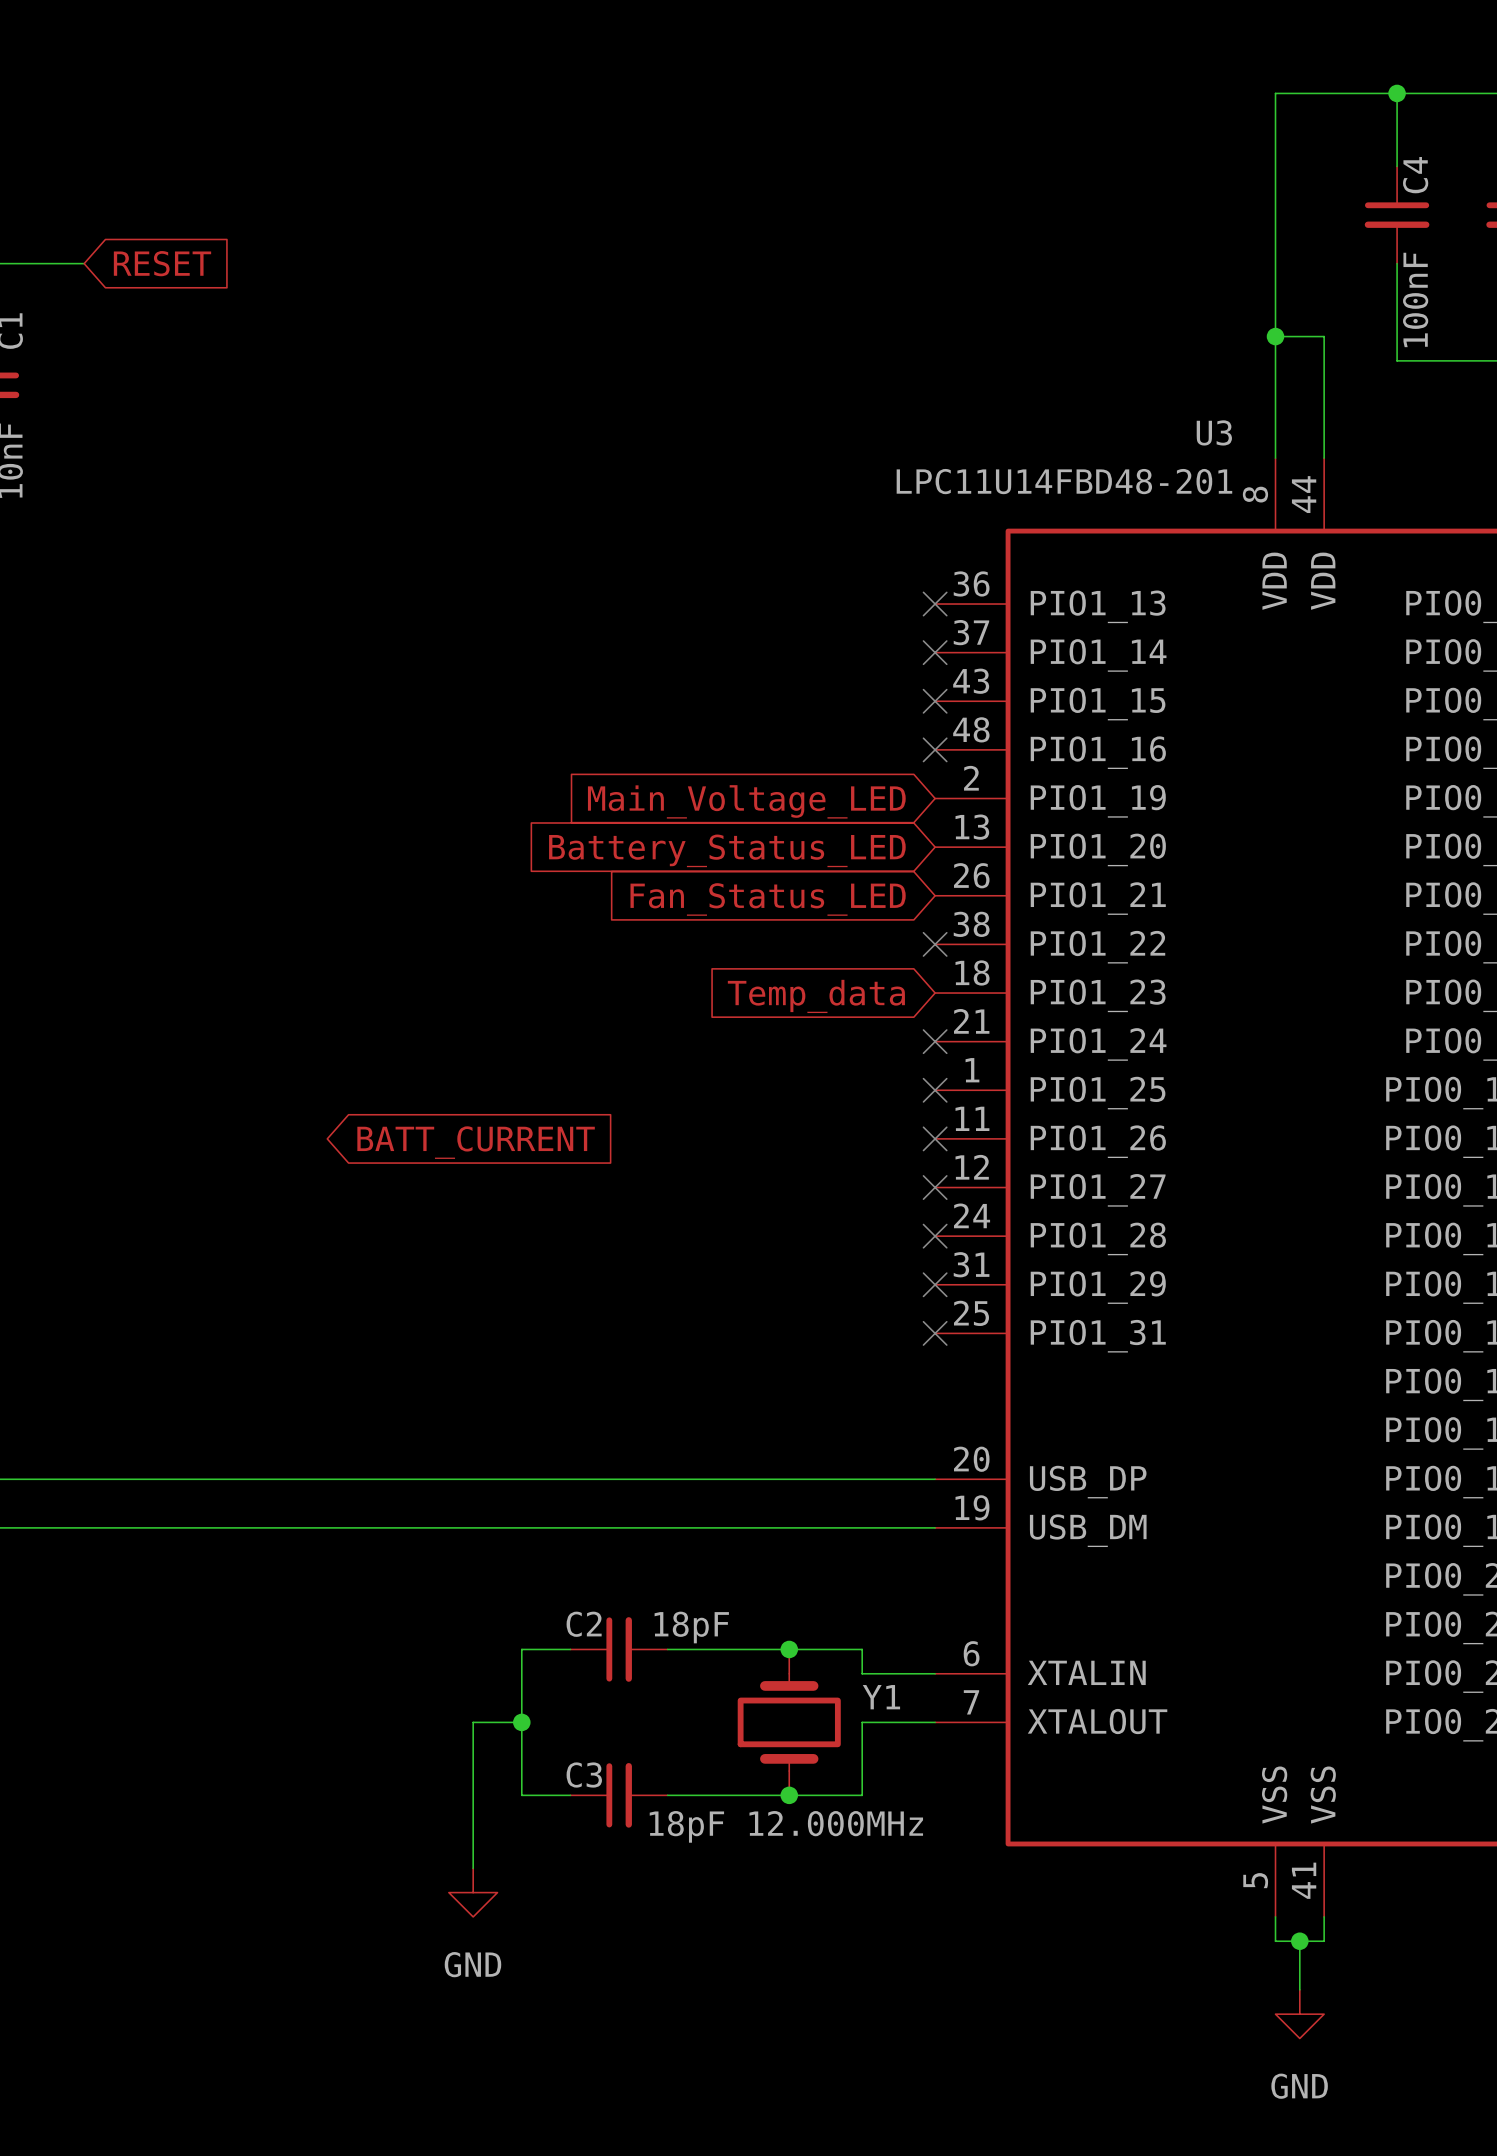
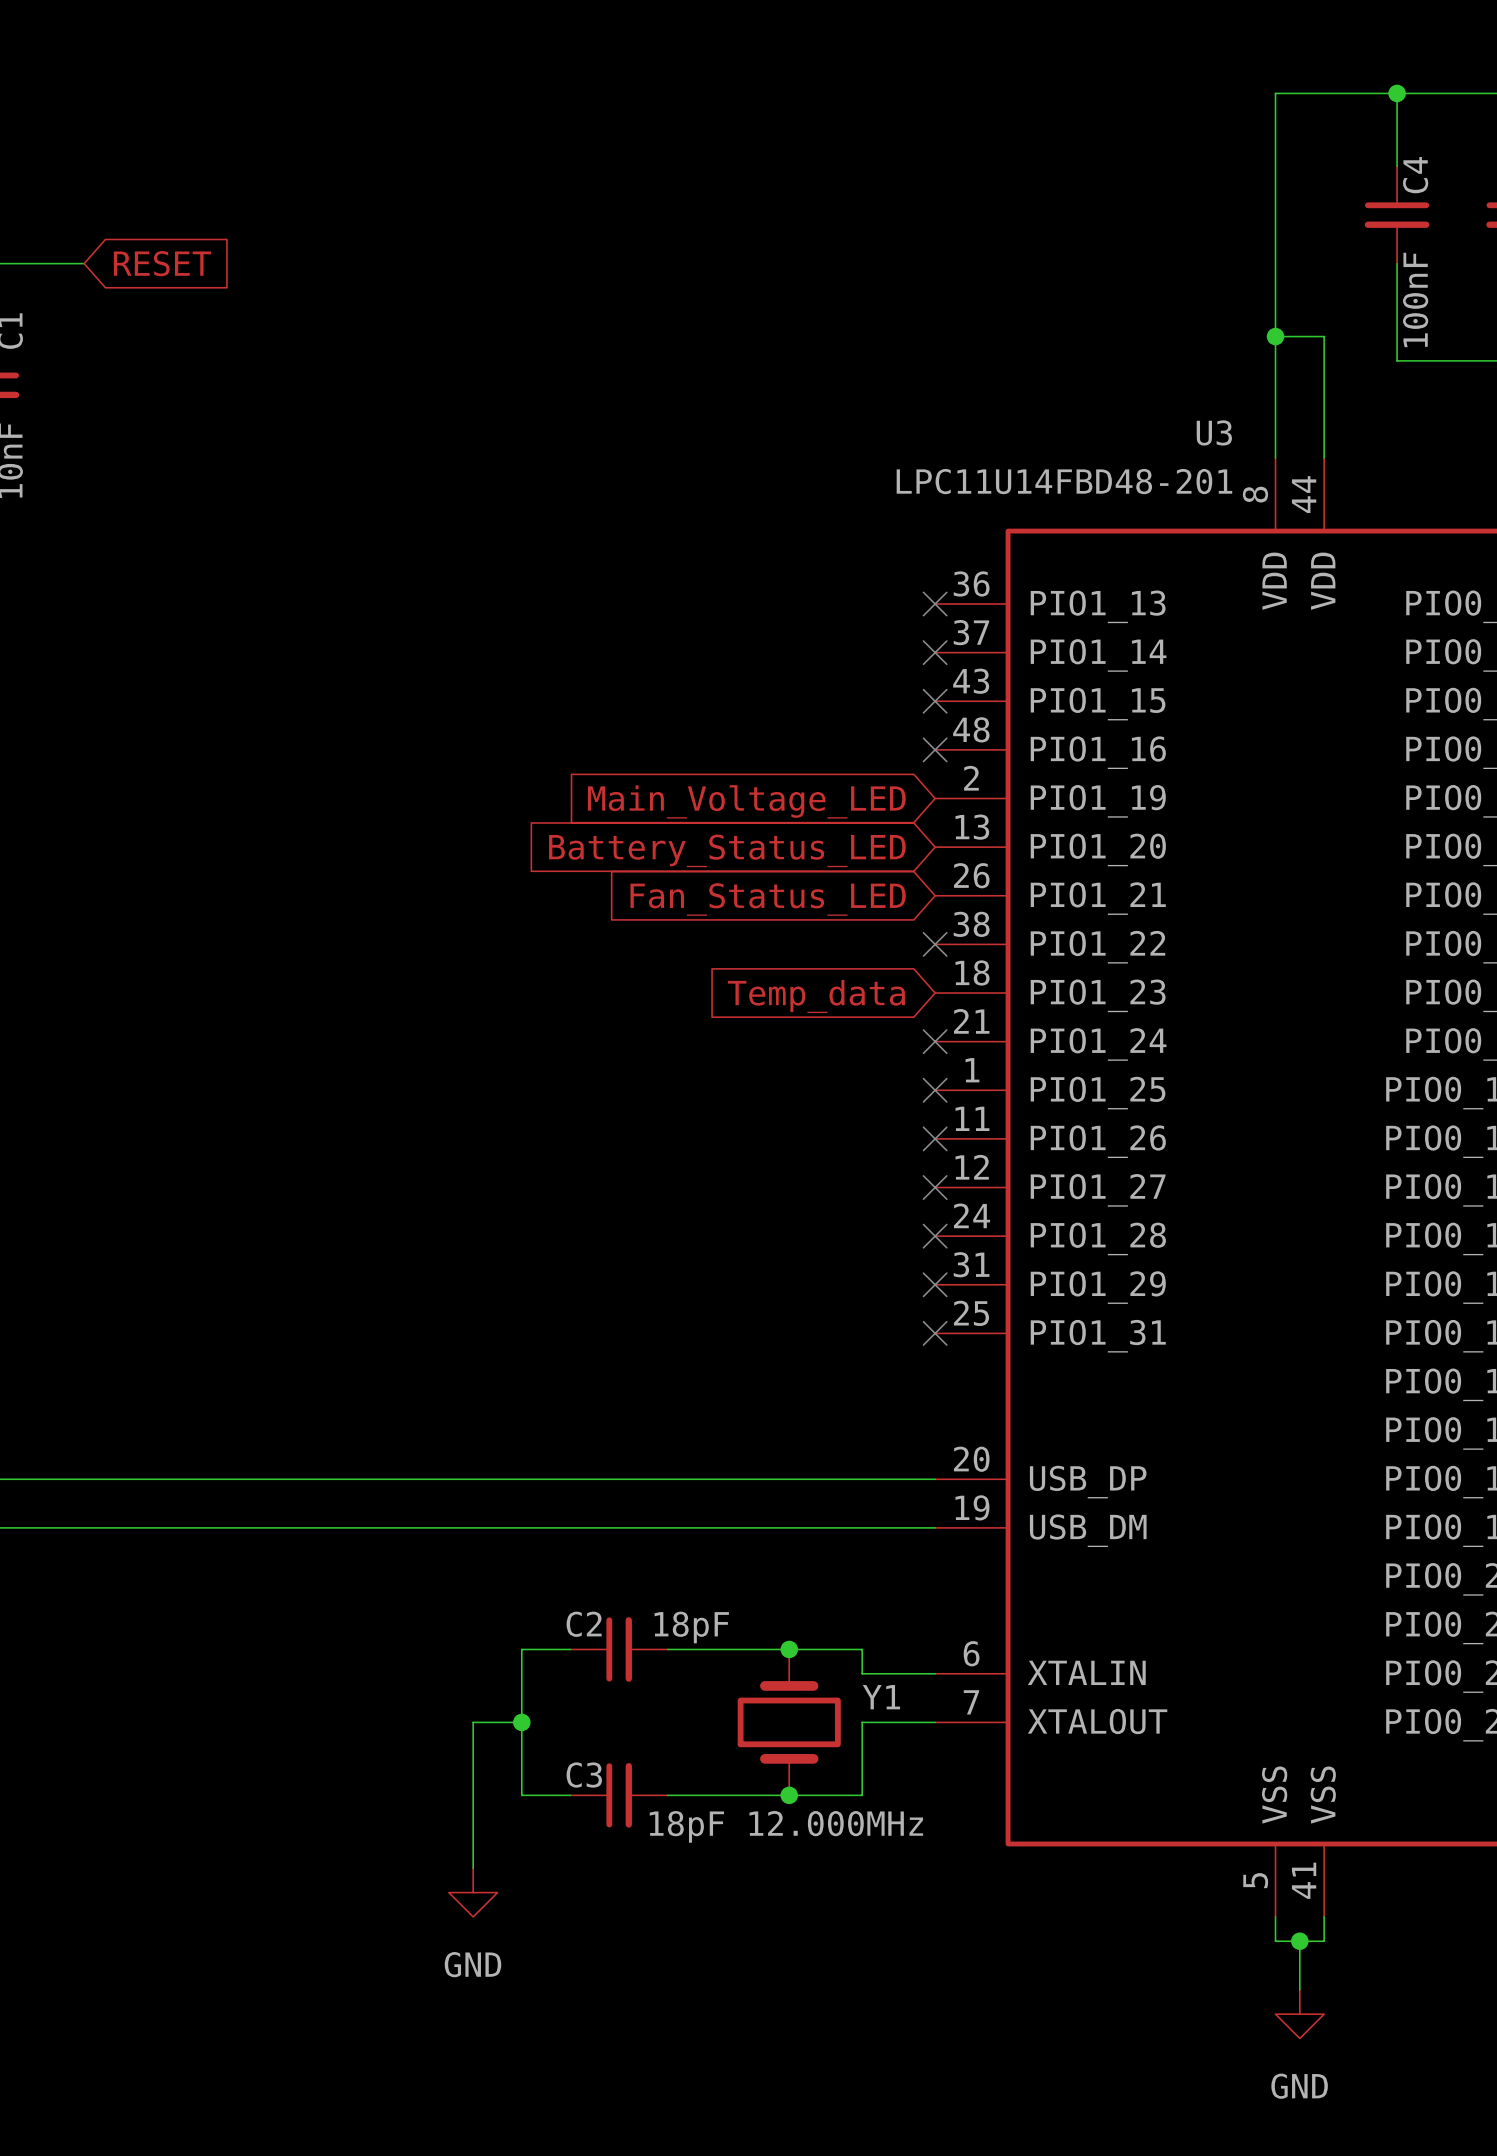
global label: BATT_CURRENT (476, 1142) -> none

